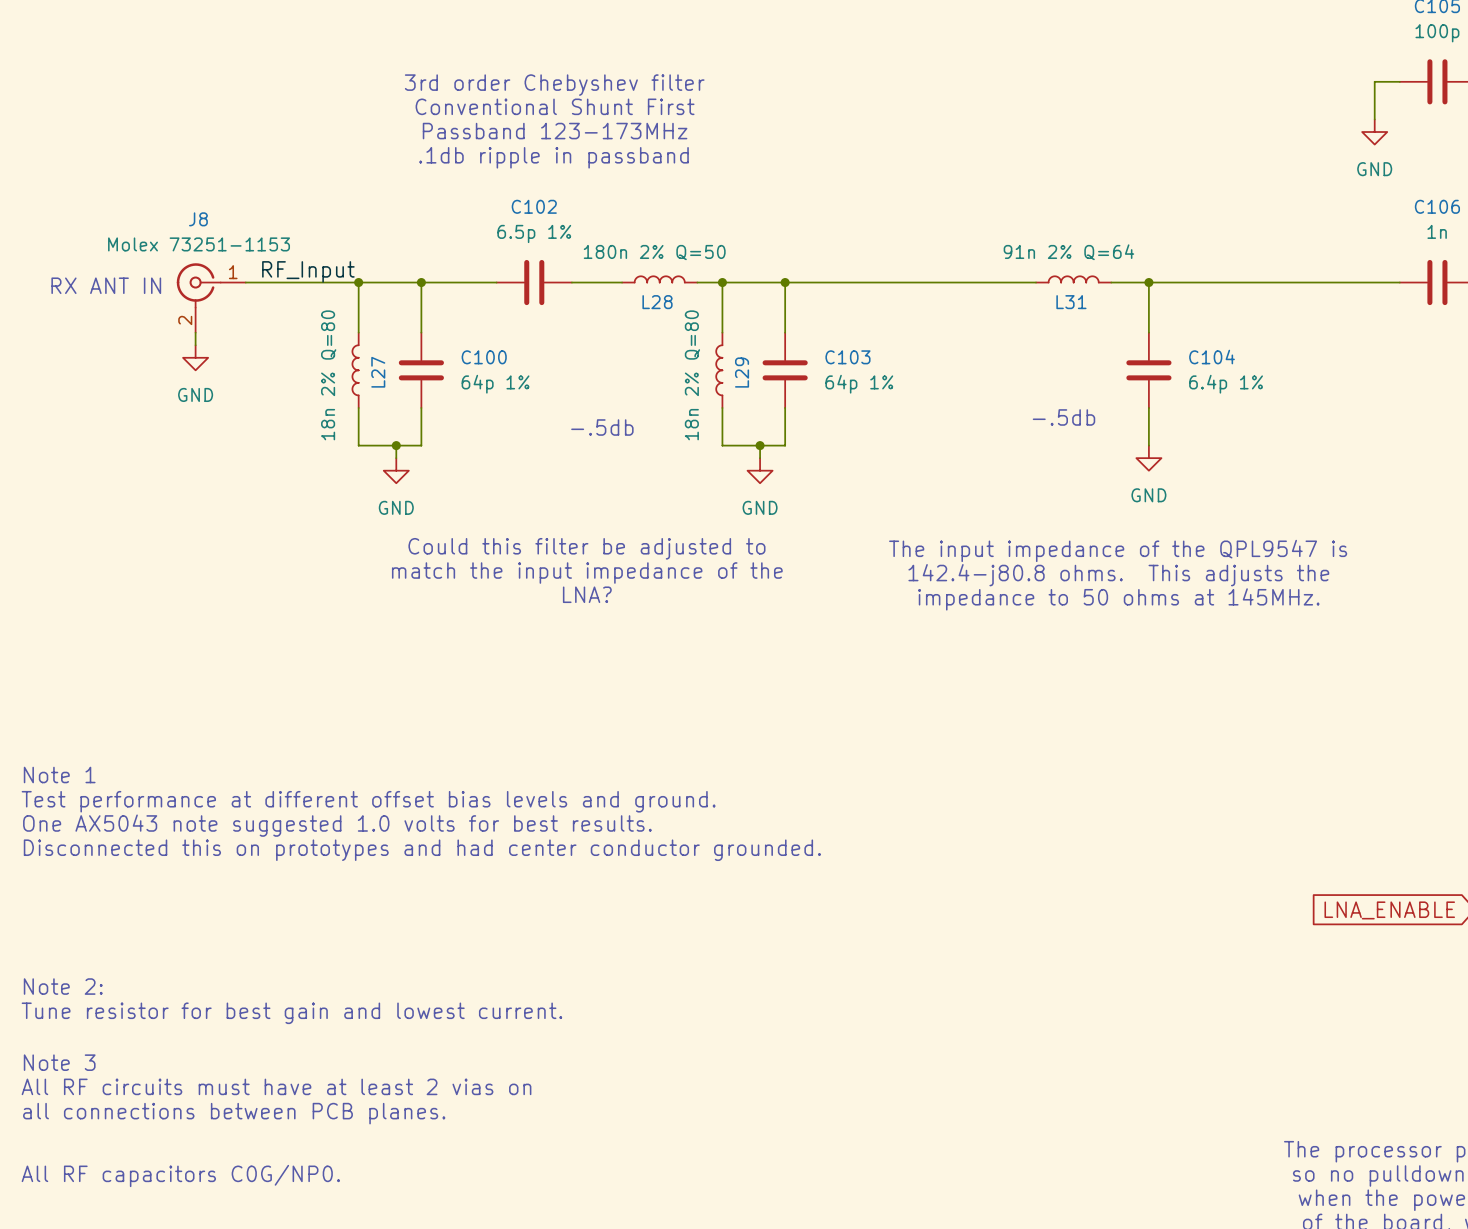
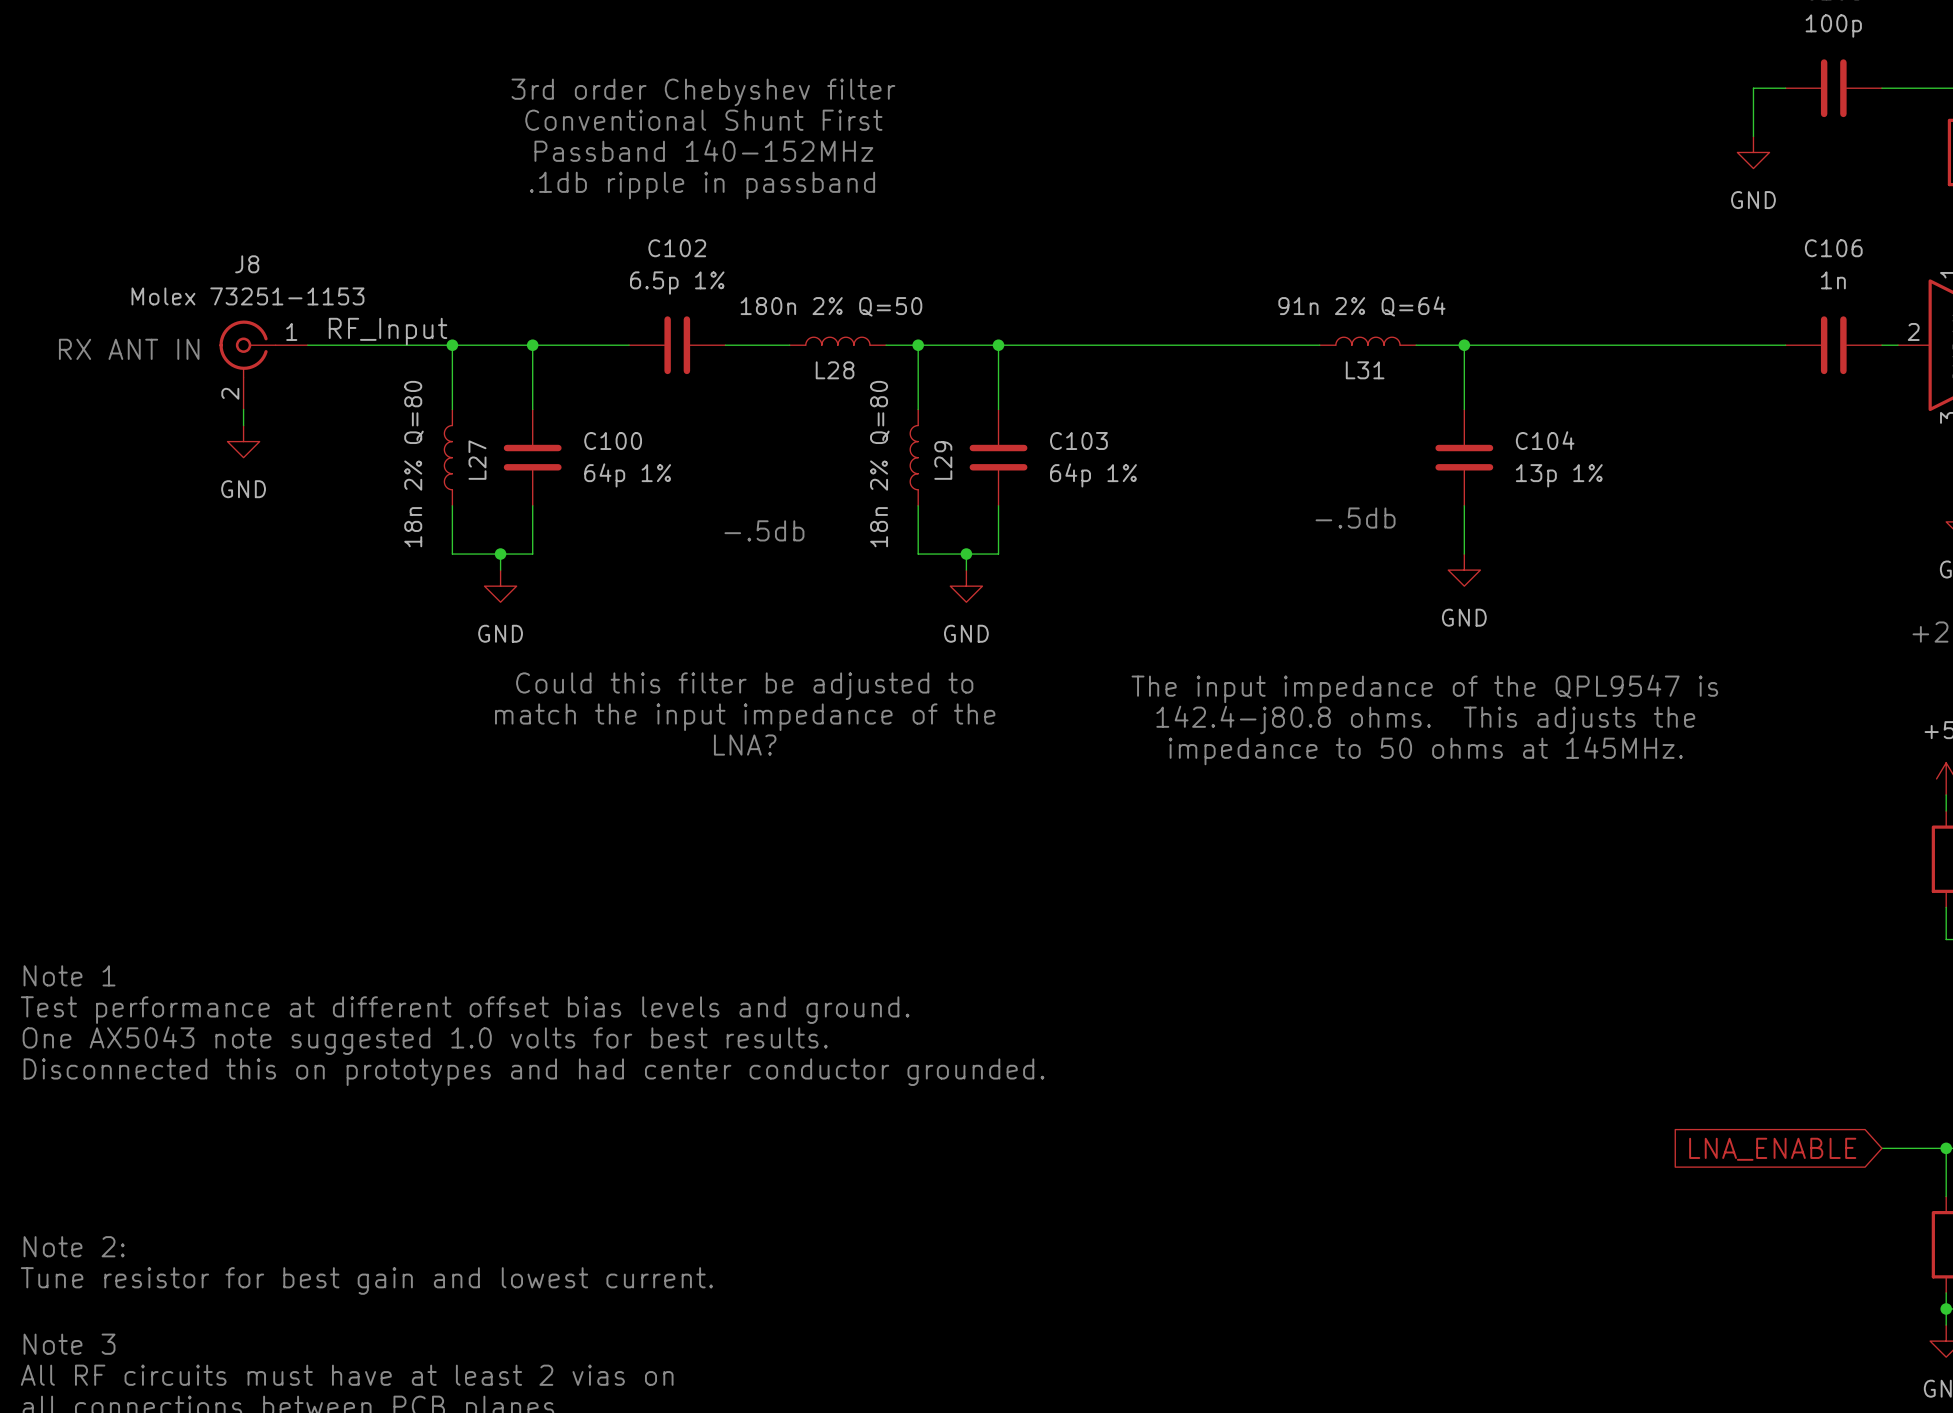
text: Passband 123-173MHz (555, 131) -> Passband 140-152MHz (703, 150)
C104 value: 6.4p 1% (1226, 384) -> 13p 1% (1559, 475)

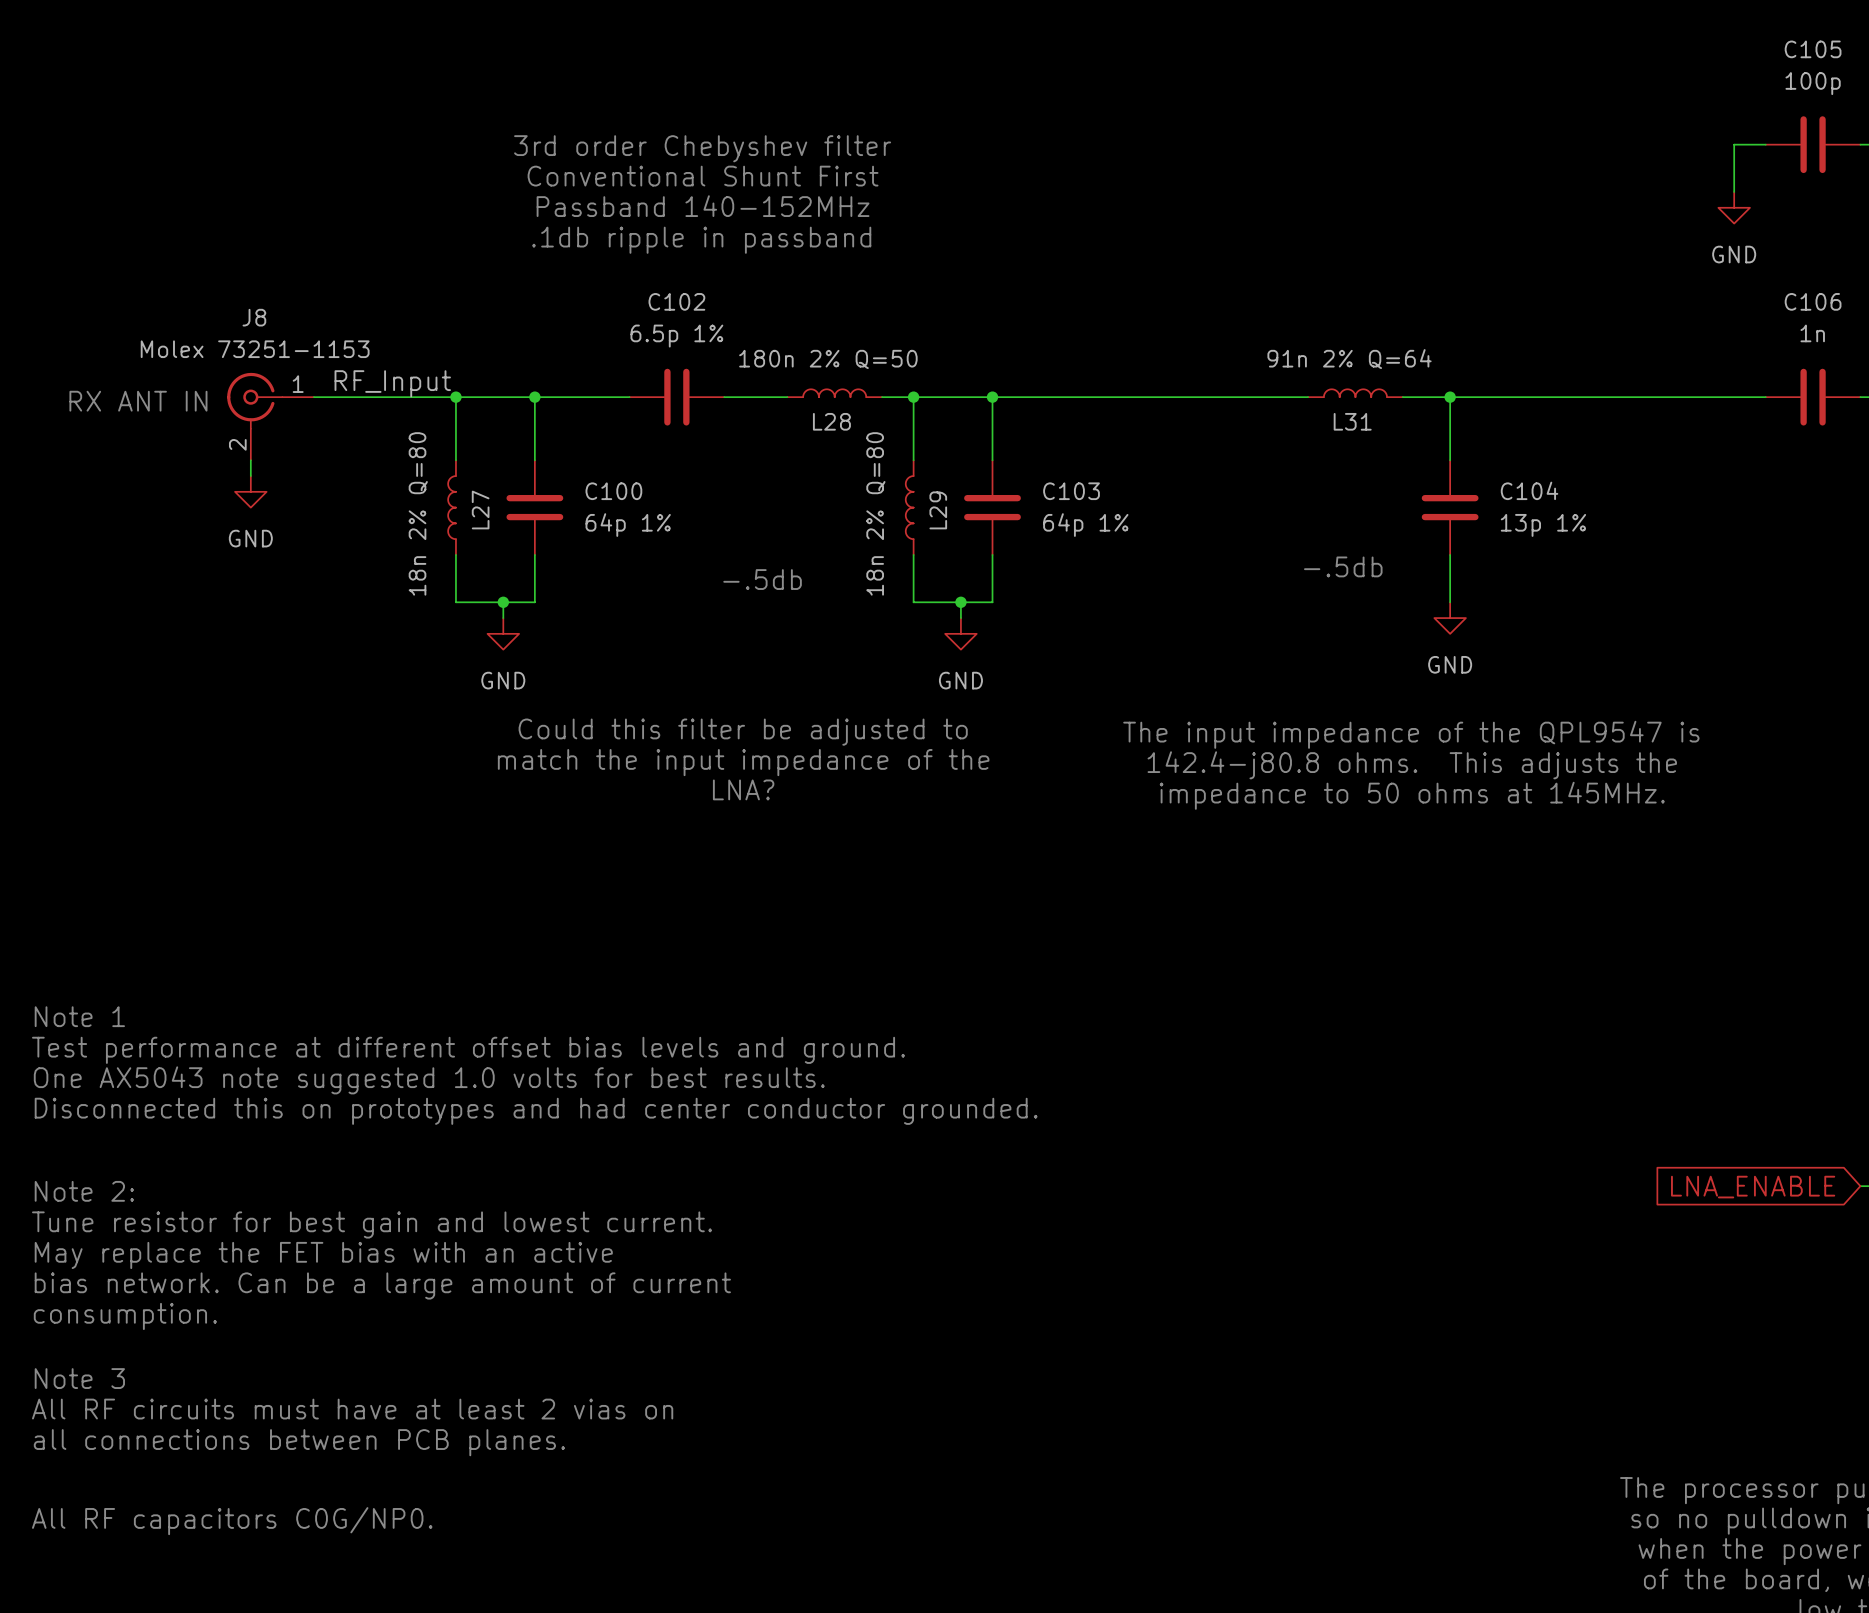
text: none -> Note 2: (84, 1191)
text: none -> Tune resistor for best gain and lowest current. (372, 1224)
text: none -> May replace the FET bias with an active (323, 1255)
text: Note 2: (74, 1246) -> bias network. Can be a large amount of current (382, 1285)
text: Tune resistor for best gain and lowest current. (366, 1280) -> consumption. (125, 1316)

